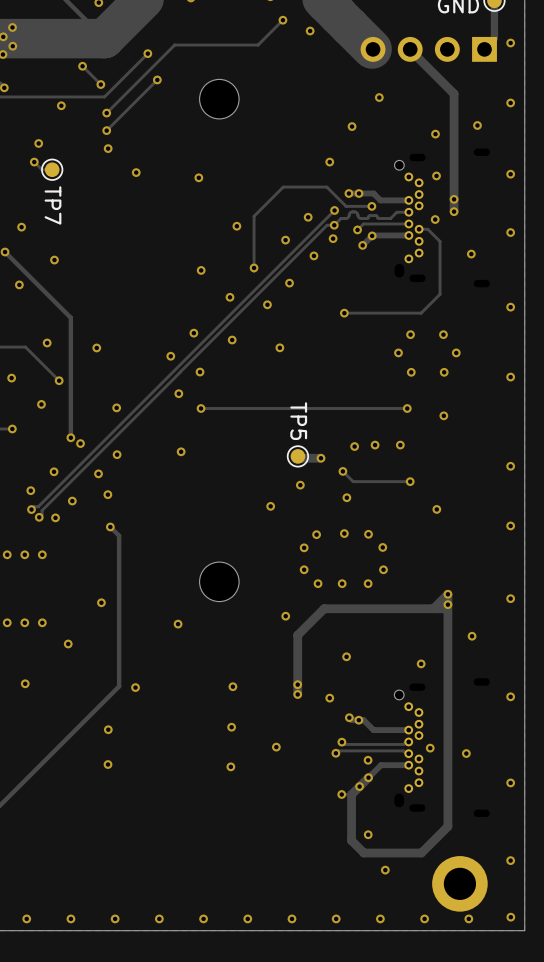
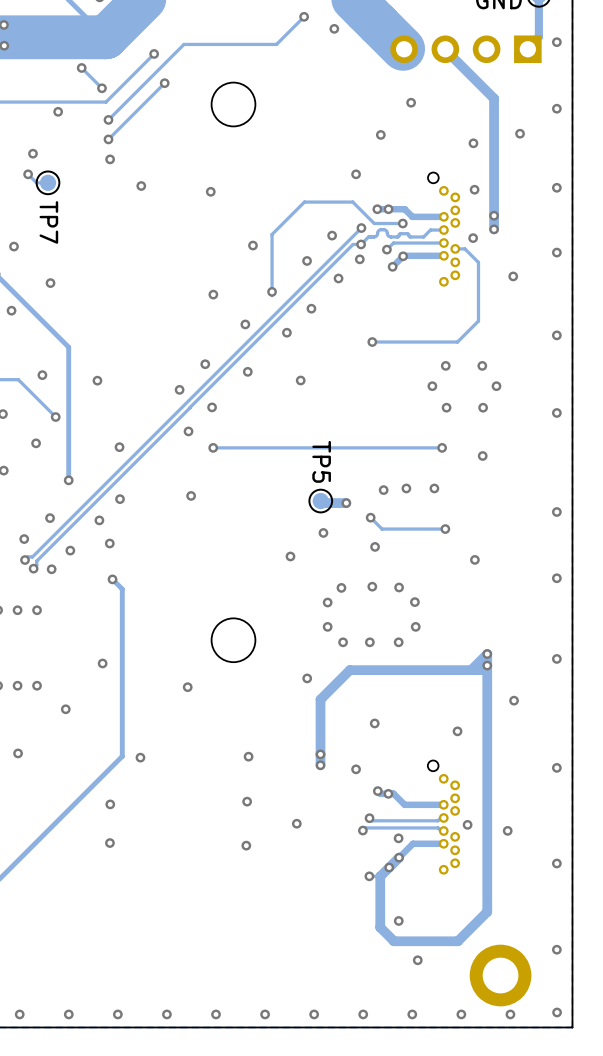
via: (80, 443) -> none

